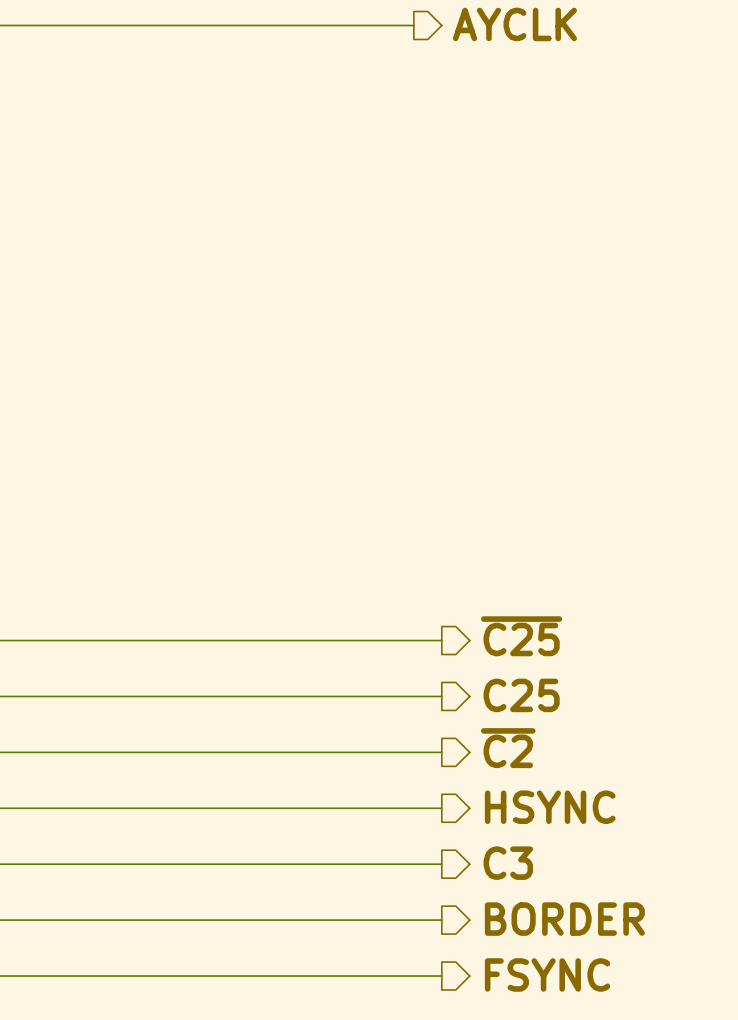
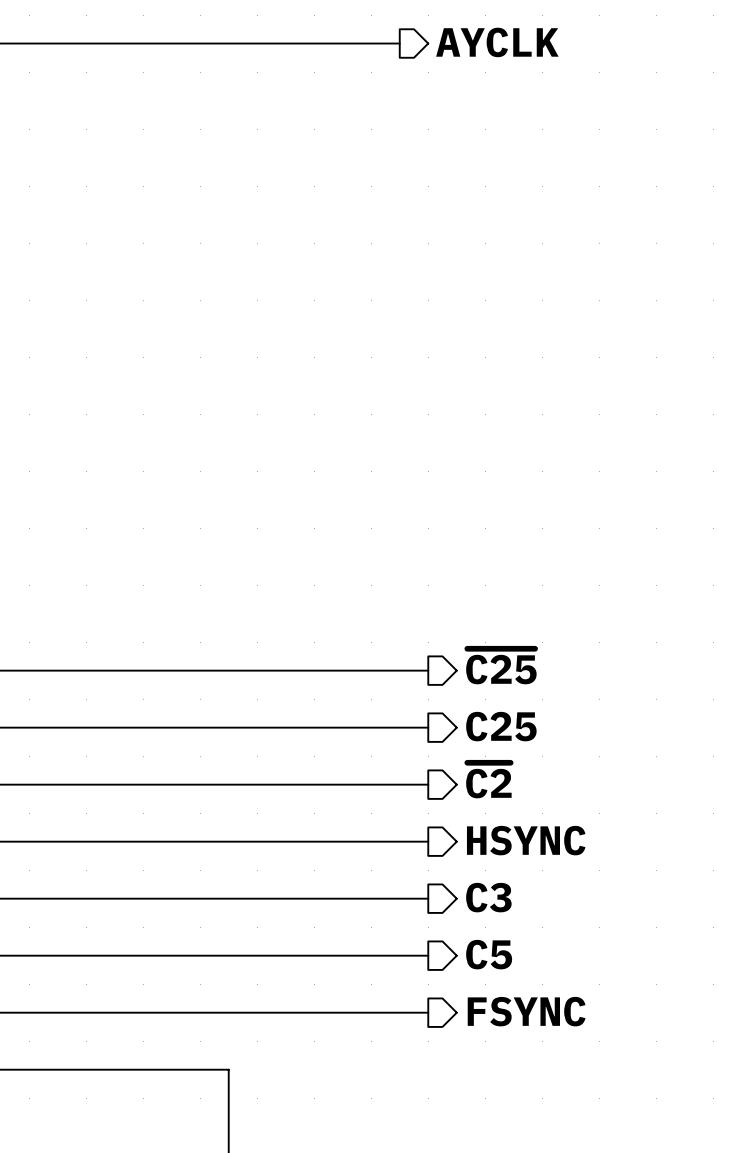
hierarchical label: BORDER (564, 919) -> C5 (489, 954)

